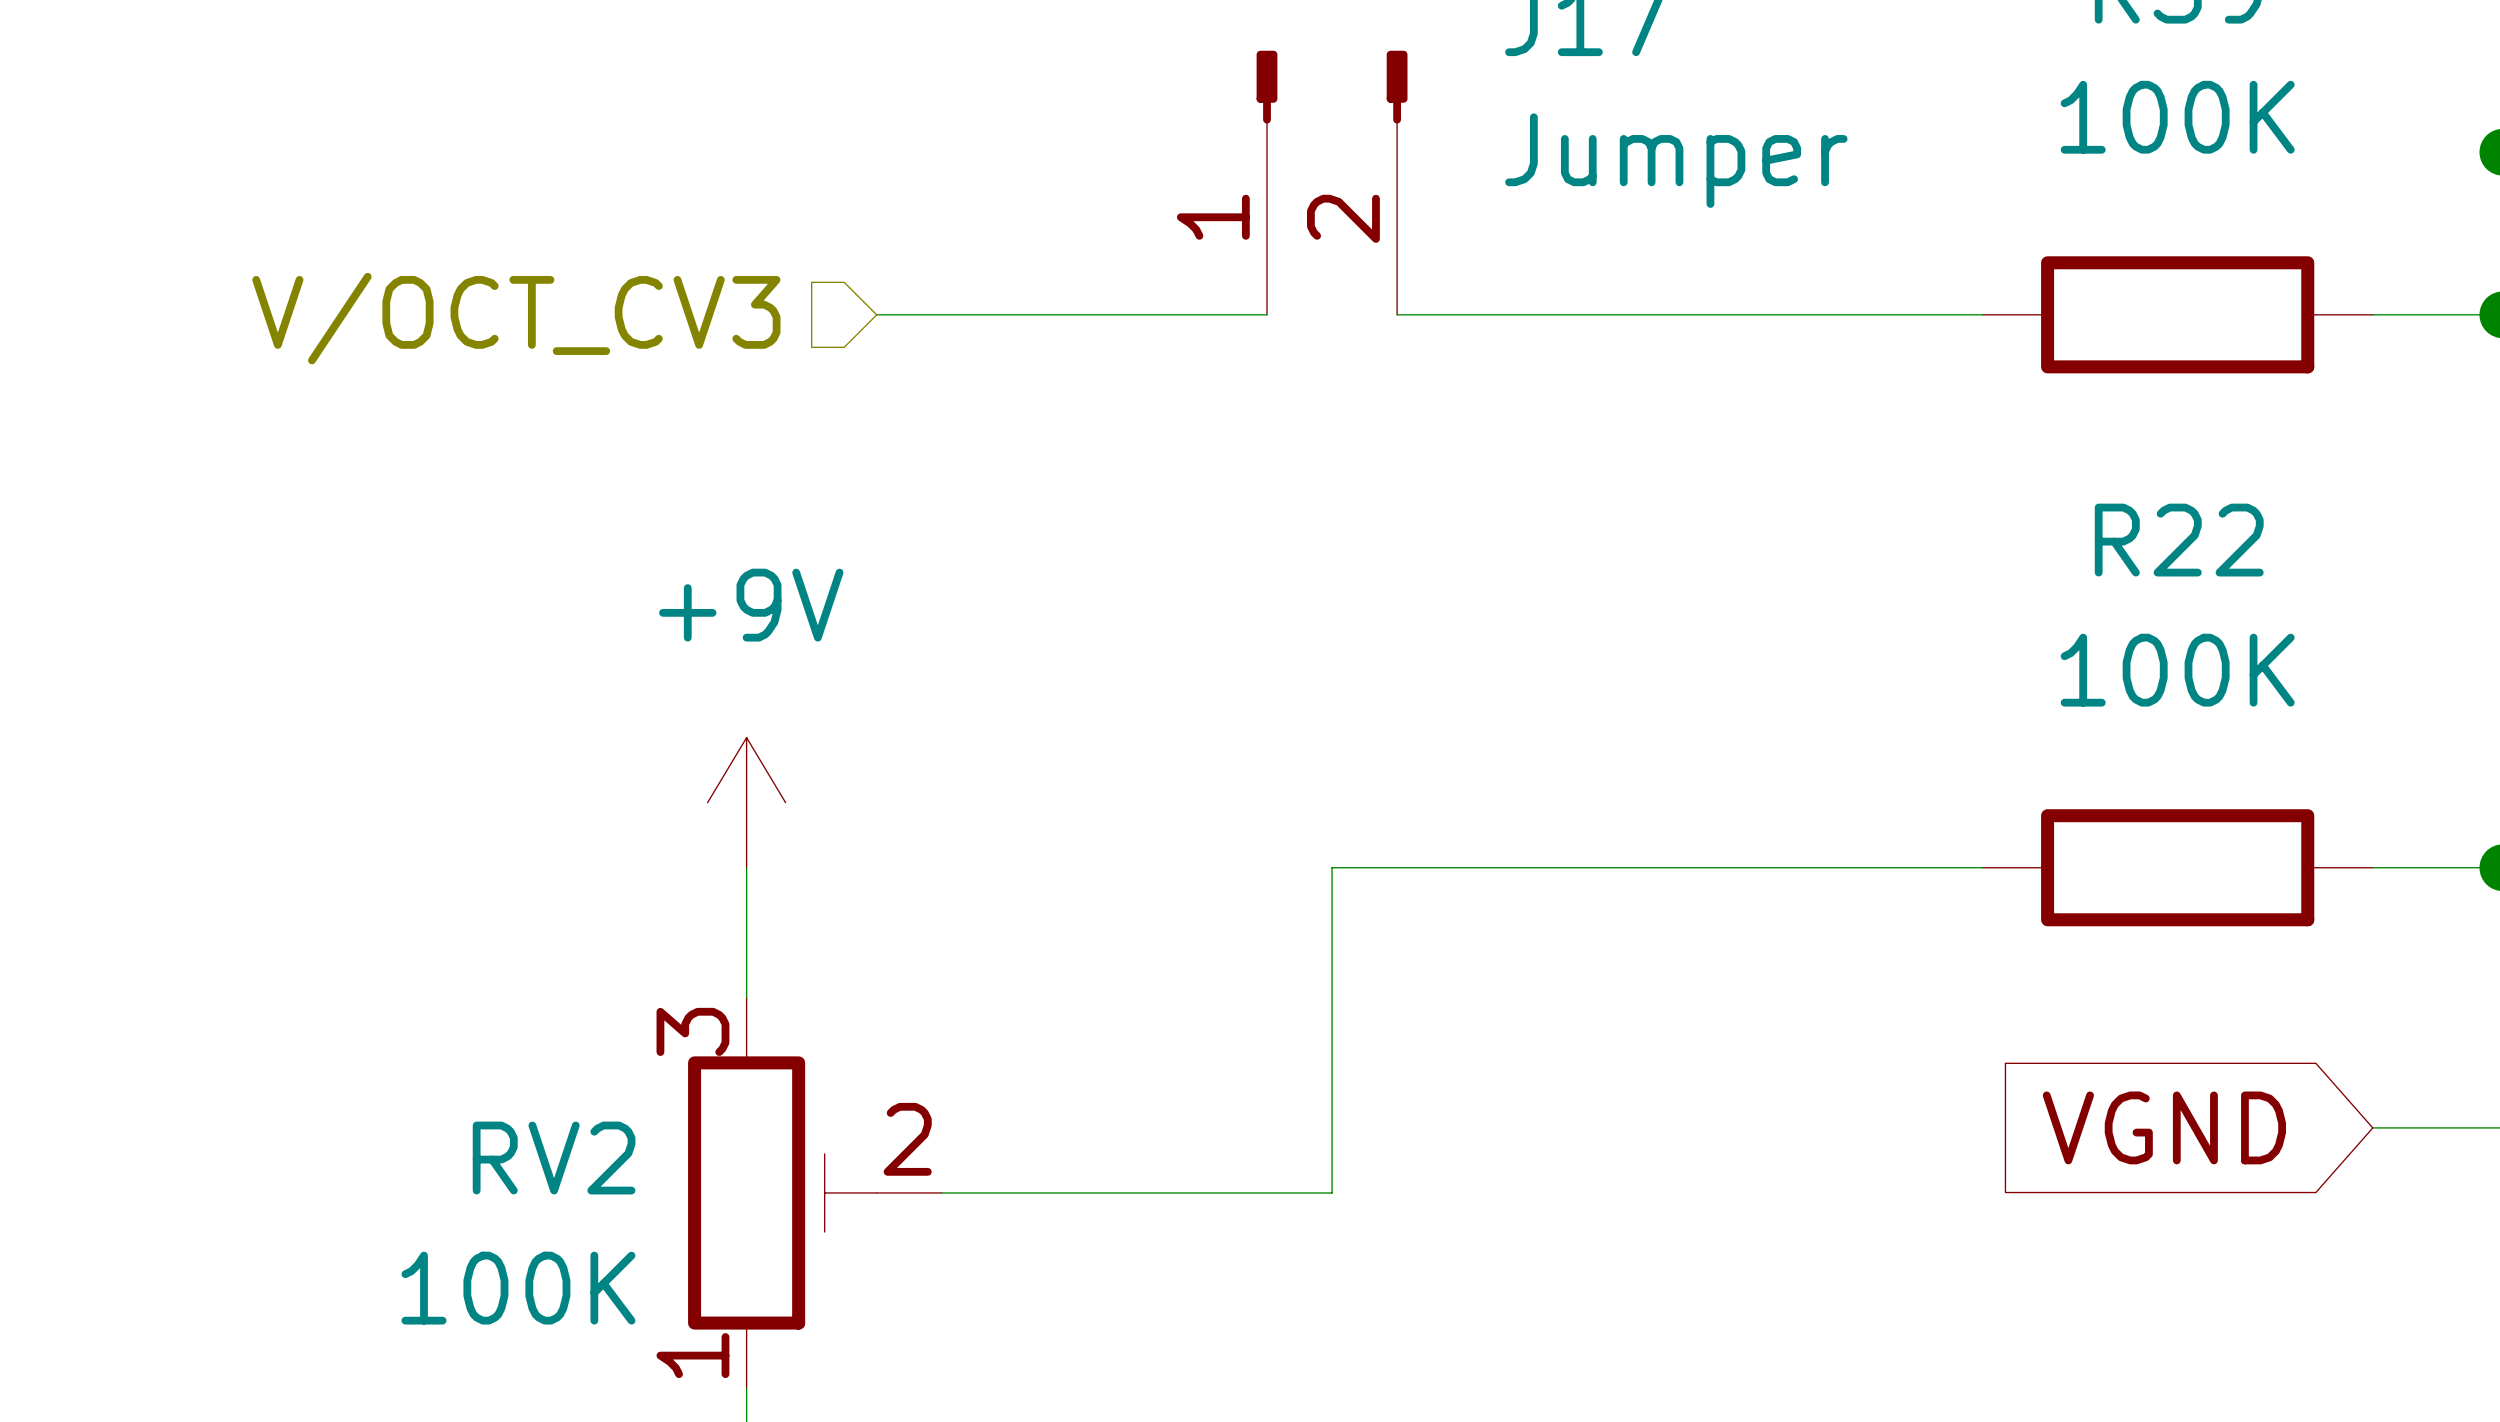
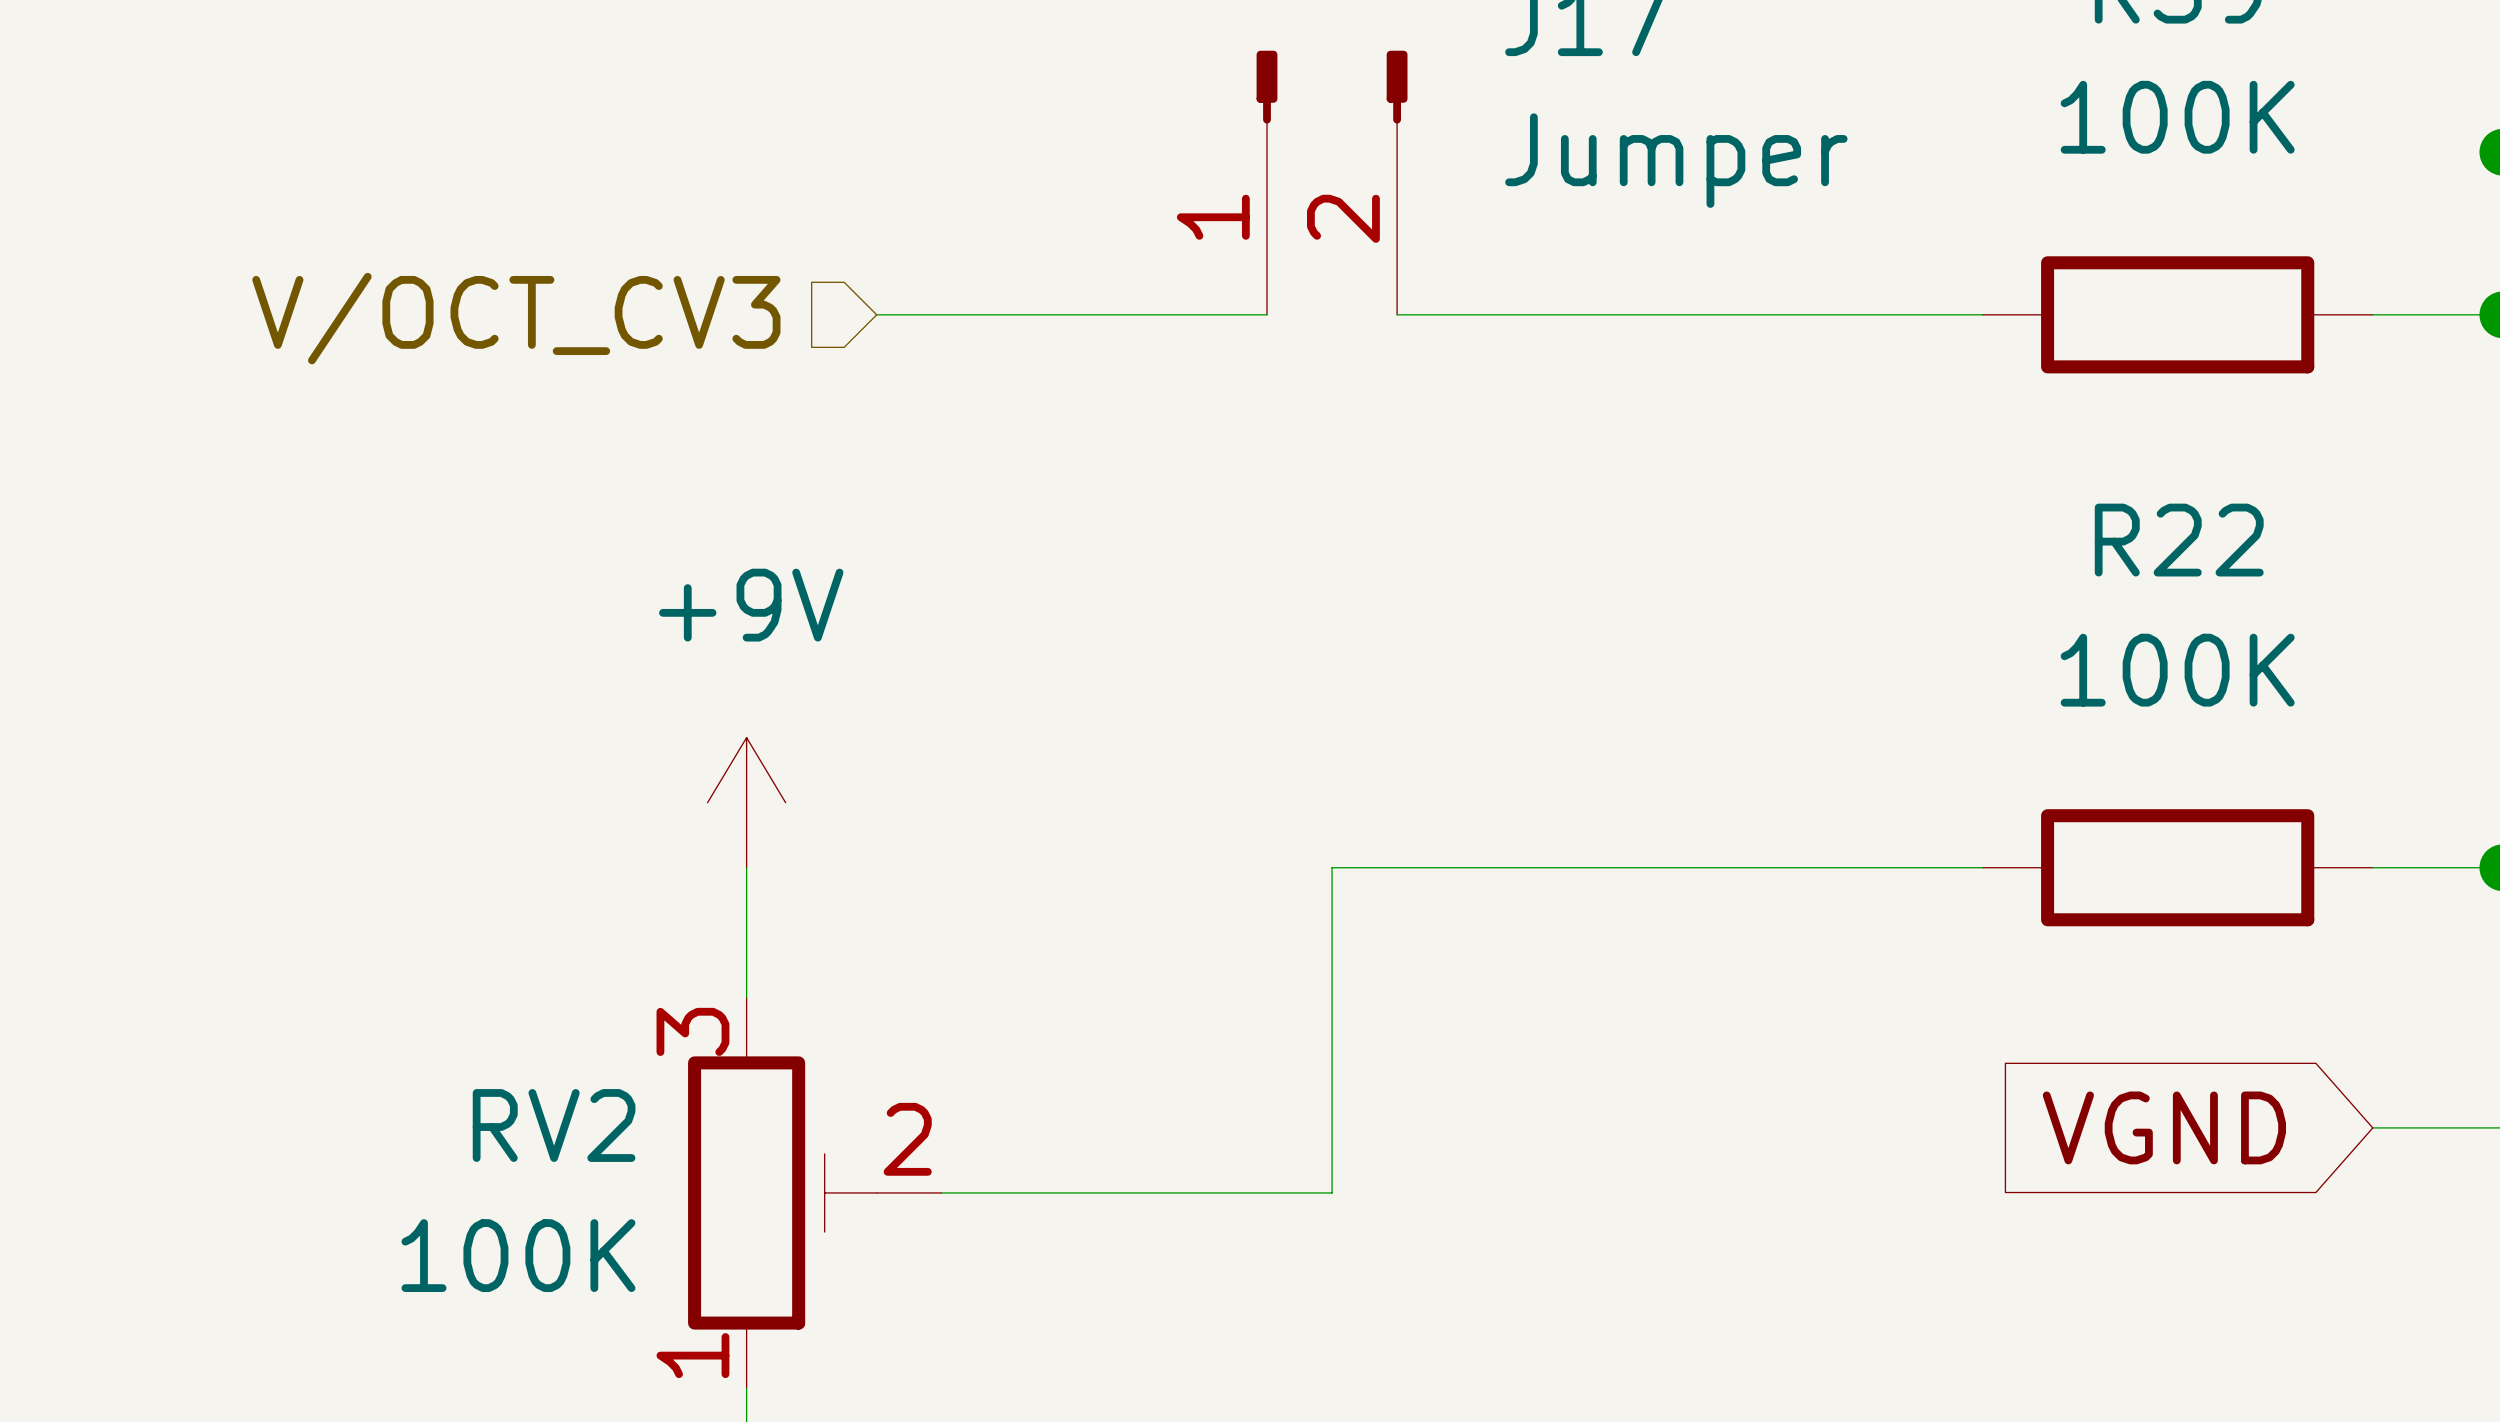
RV2 name position: RV2 (554, 1158) -> RV2 (554, 1125)
RV2 value position: 100K (518, 1288) -> 100K (518, 1255)

